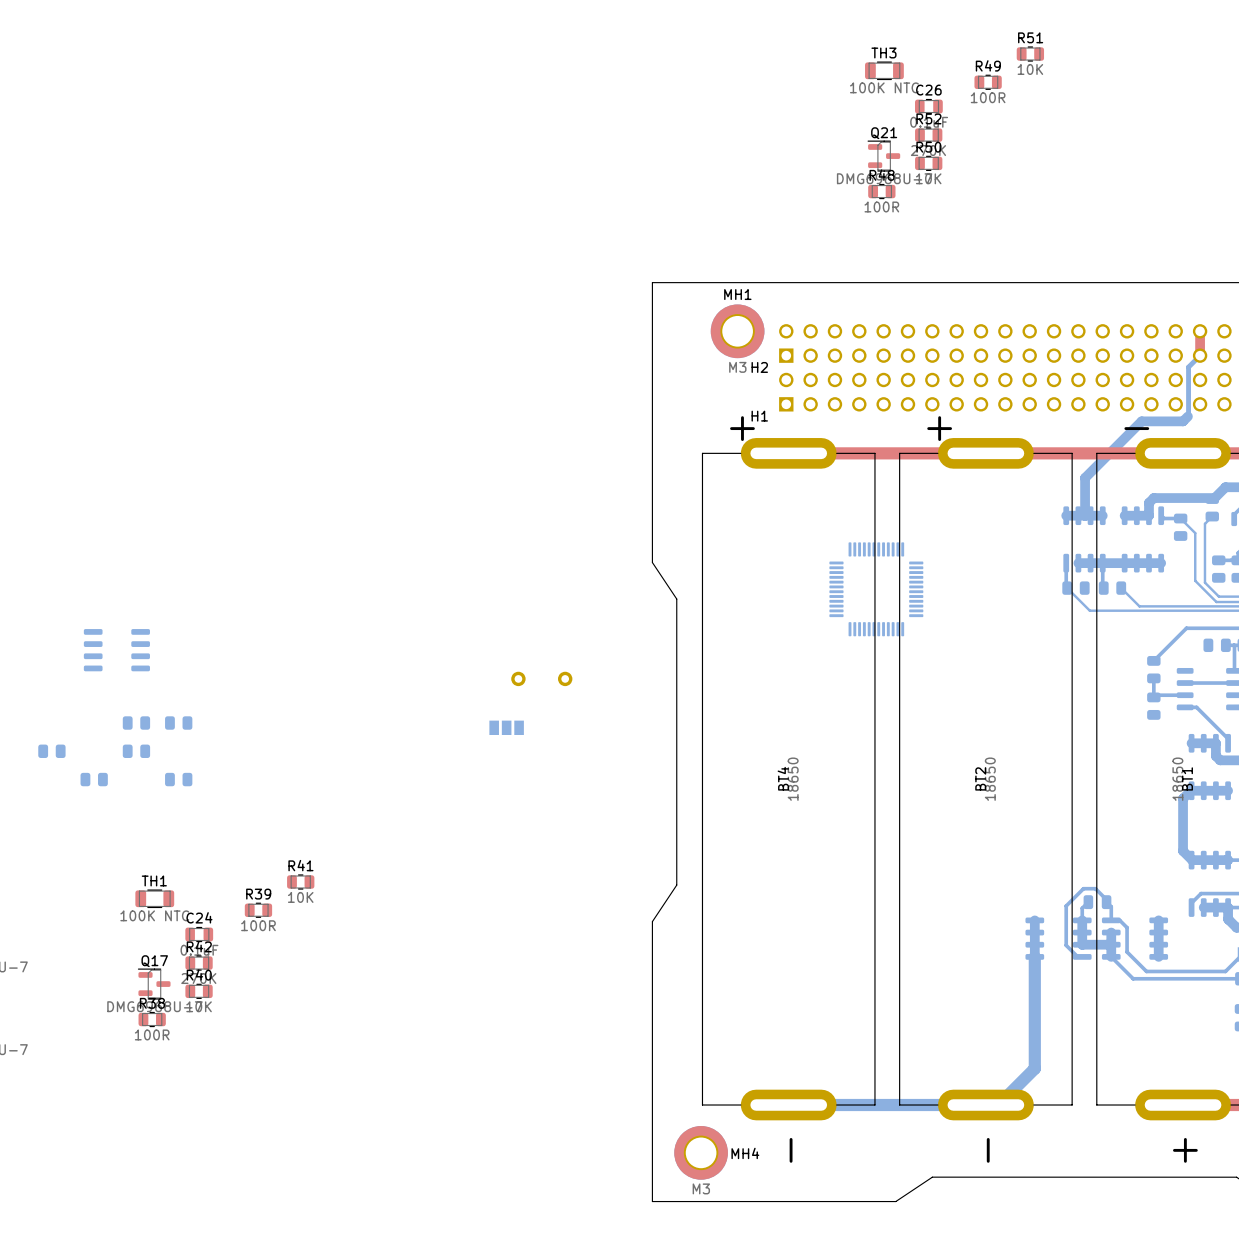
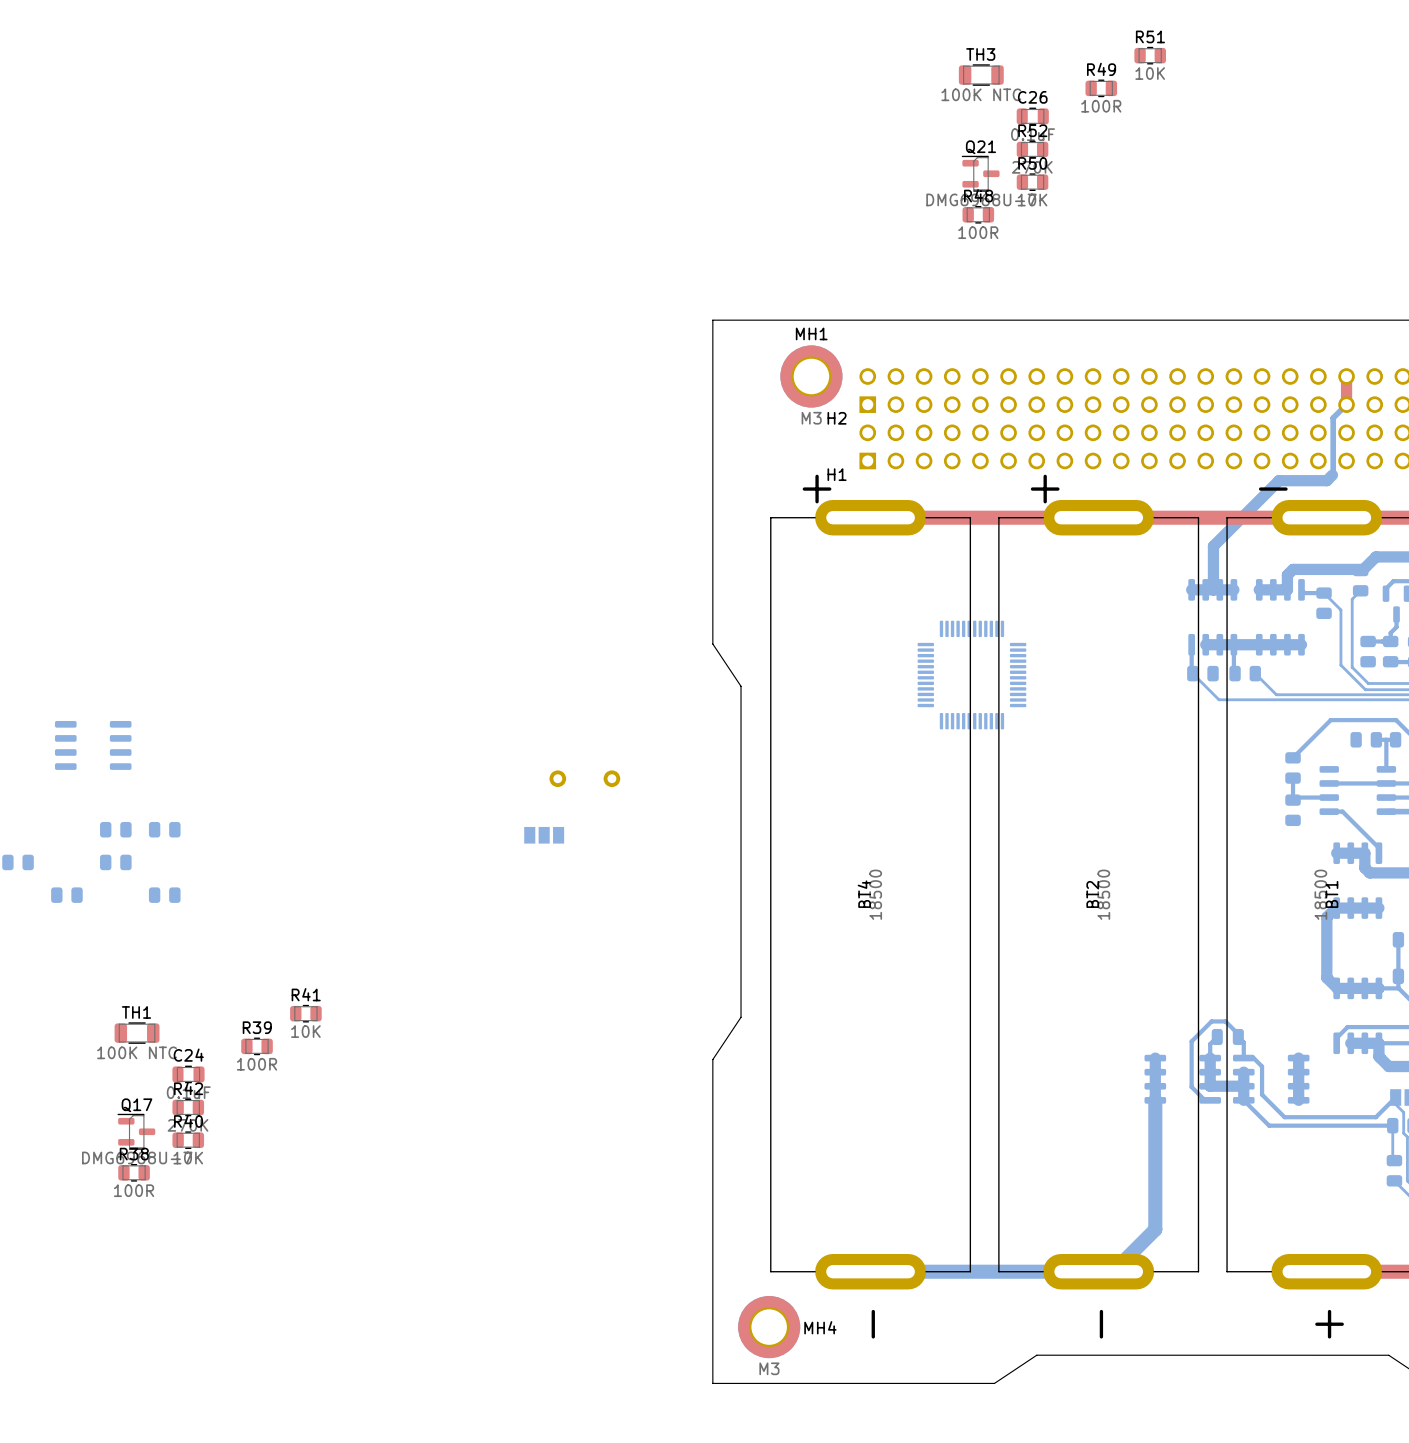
BT4 value: 18650 (793, 779) -> 18500 (875, 894)
BT2 value: 18650 (990, 779) -> 18500 (1103, 894)
BT1 value: 18650 (1177, 779) -> 18500 (1320, 894)

